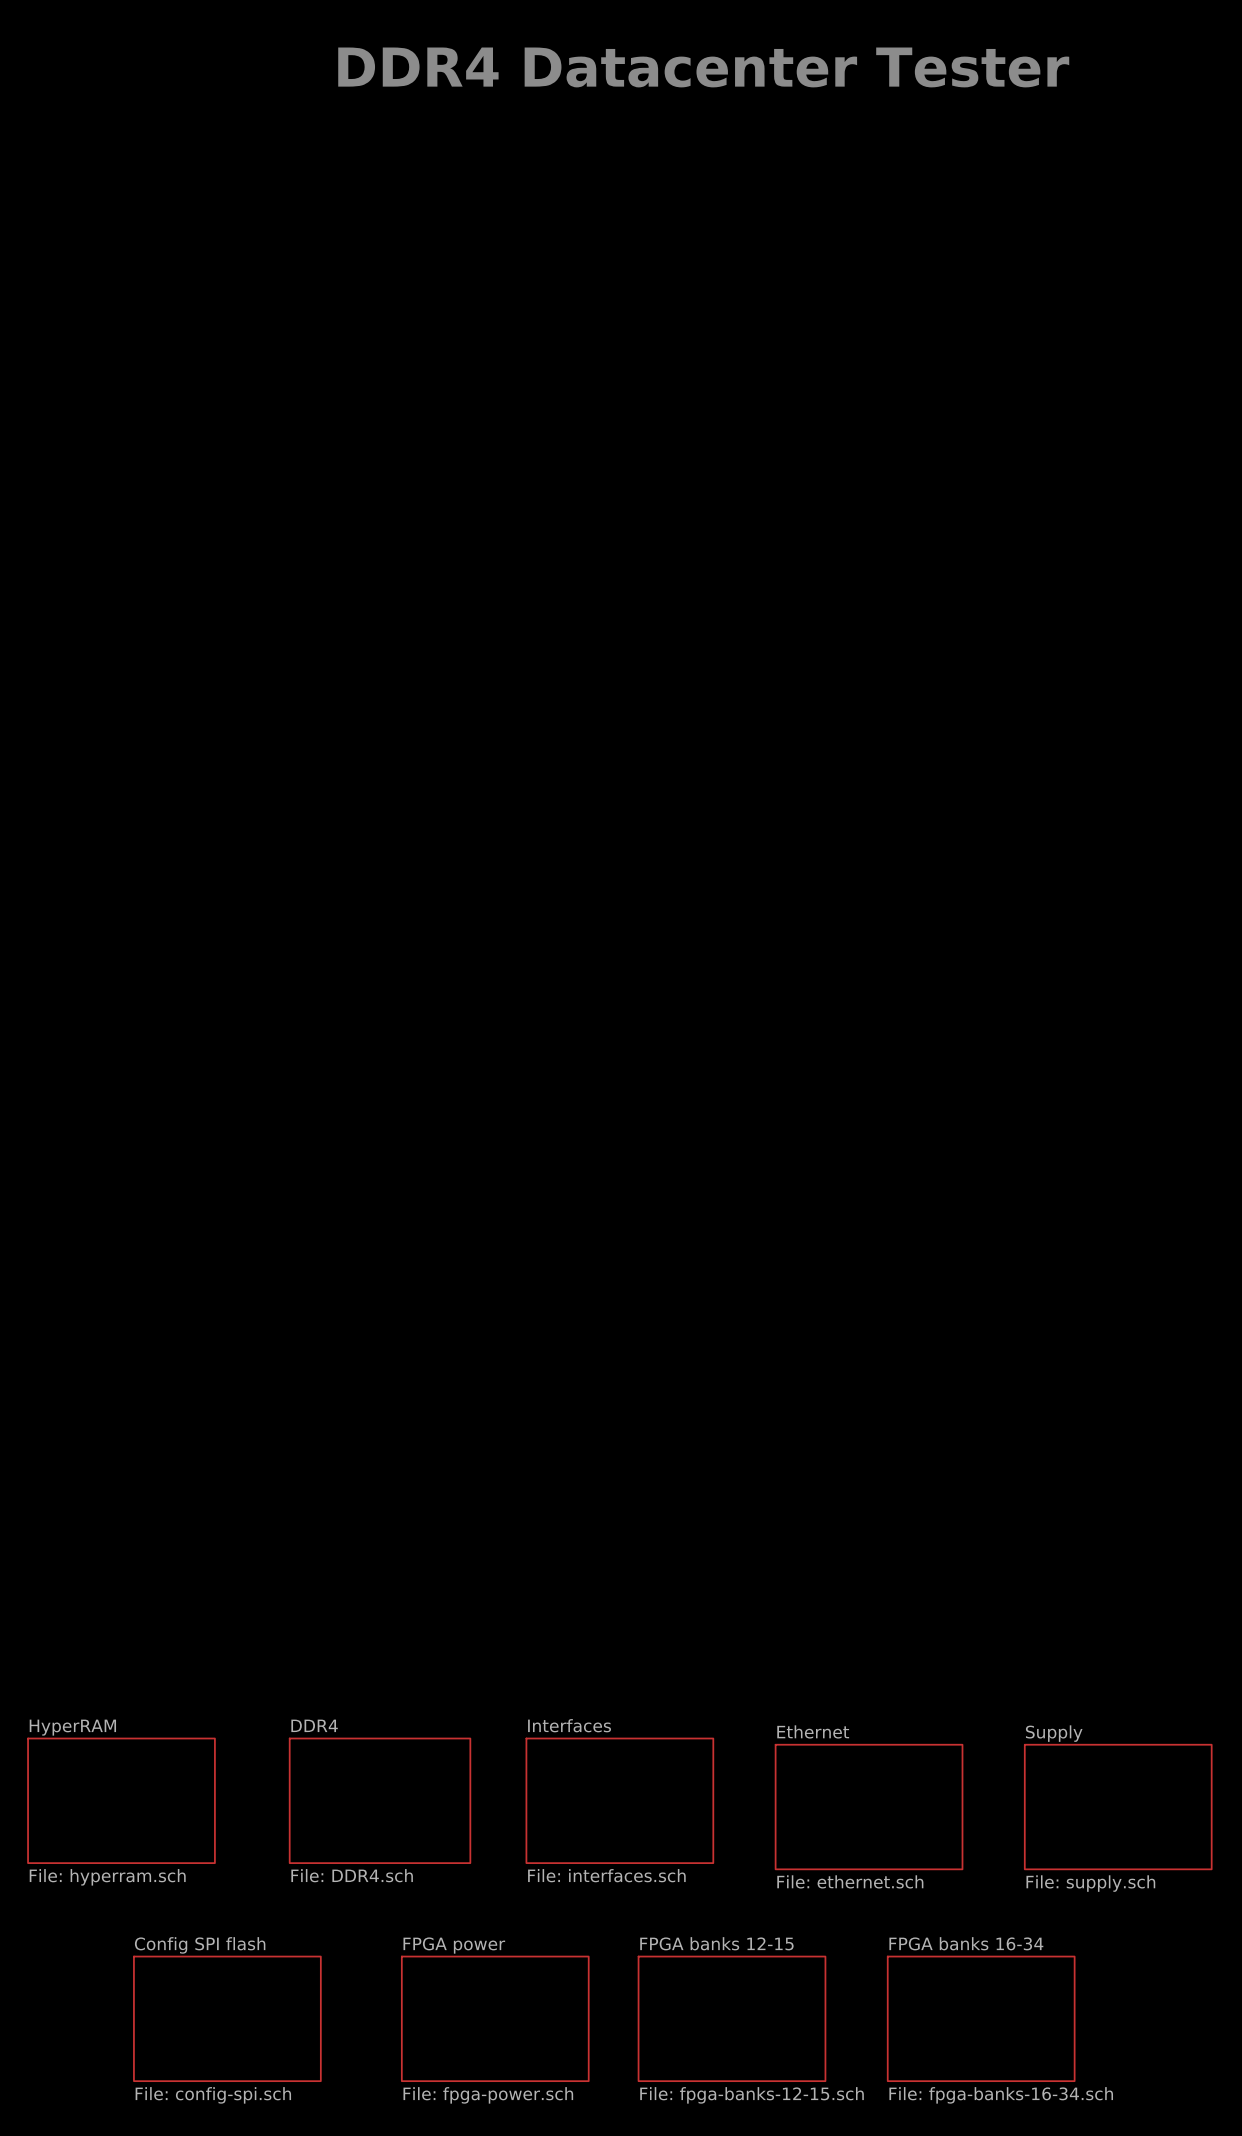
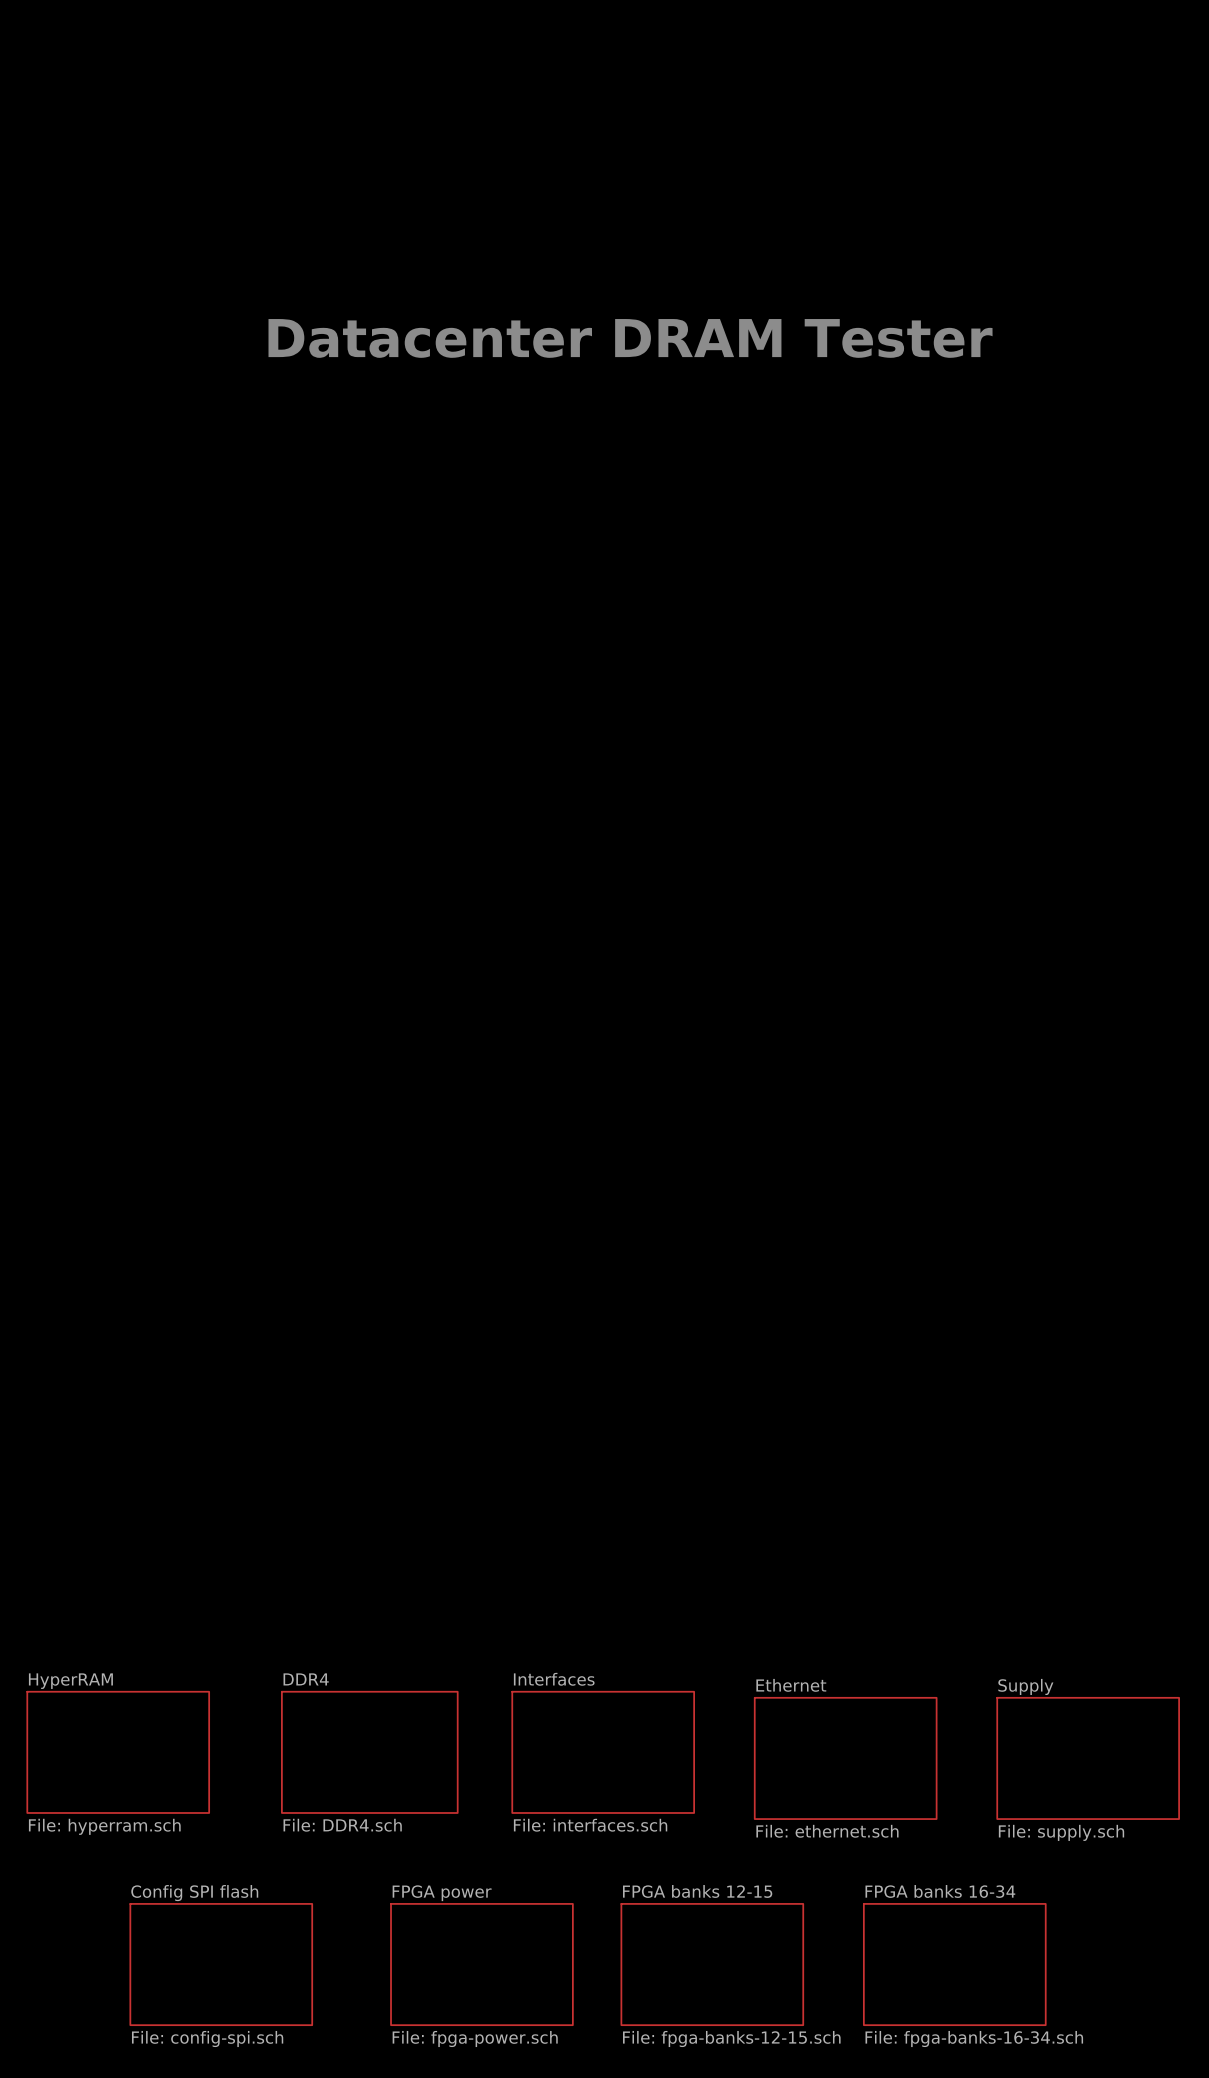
text: DDR4 Datacenter Tester (703, 67) -> none
text: none -> Datacenter DRAM Tester (630, 338)

